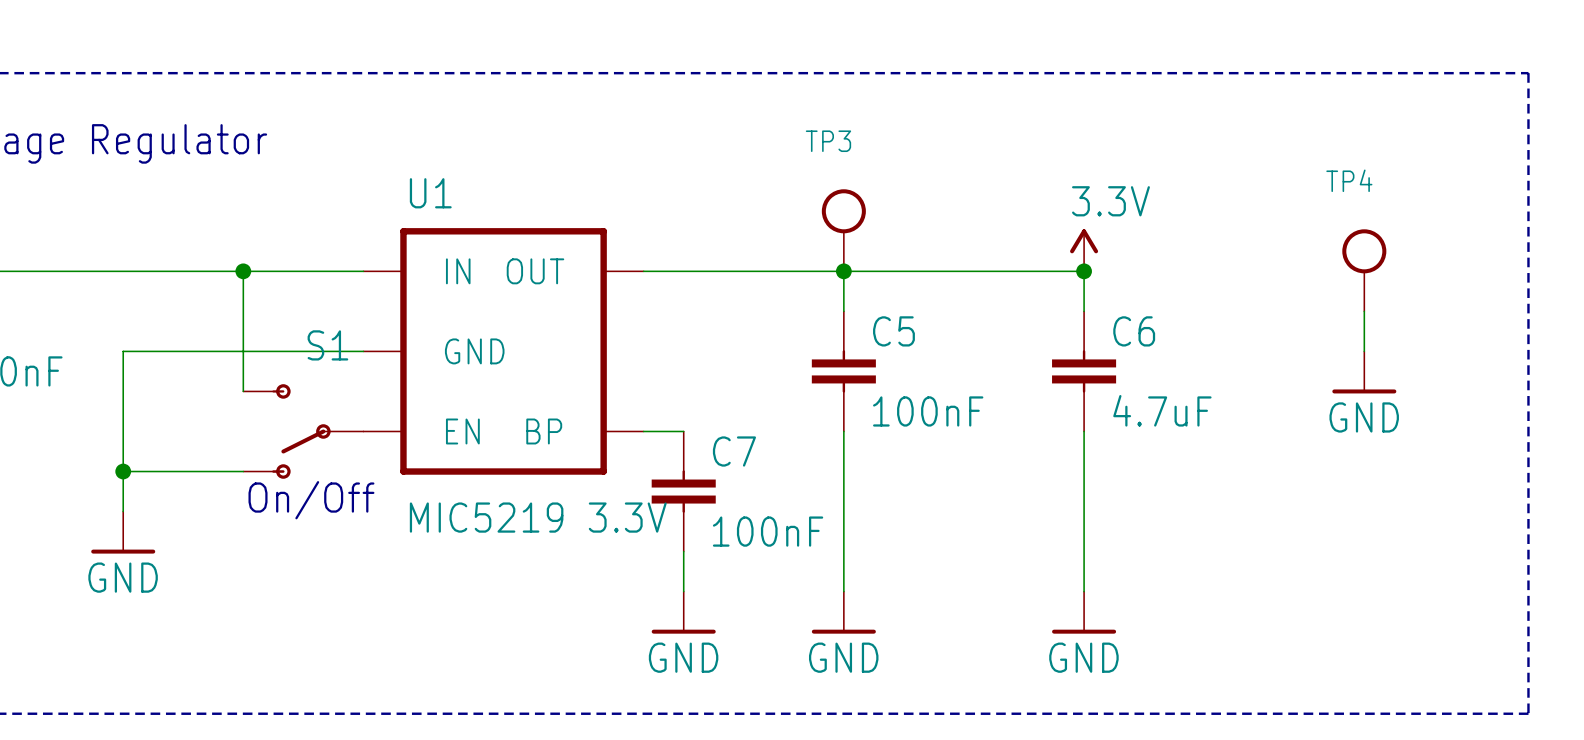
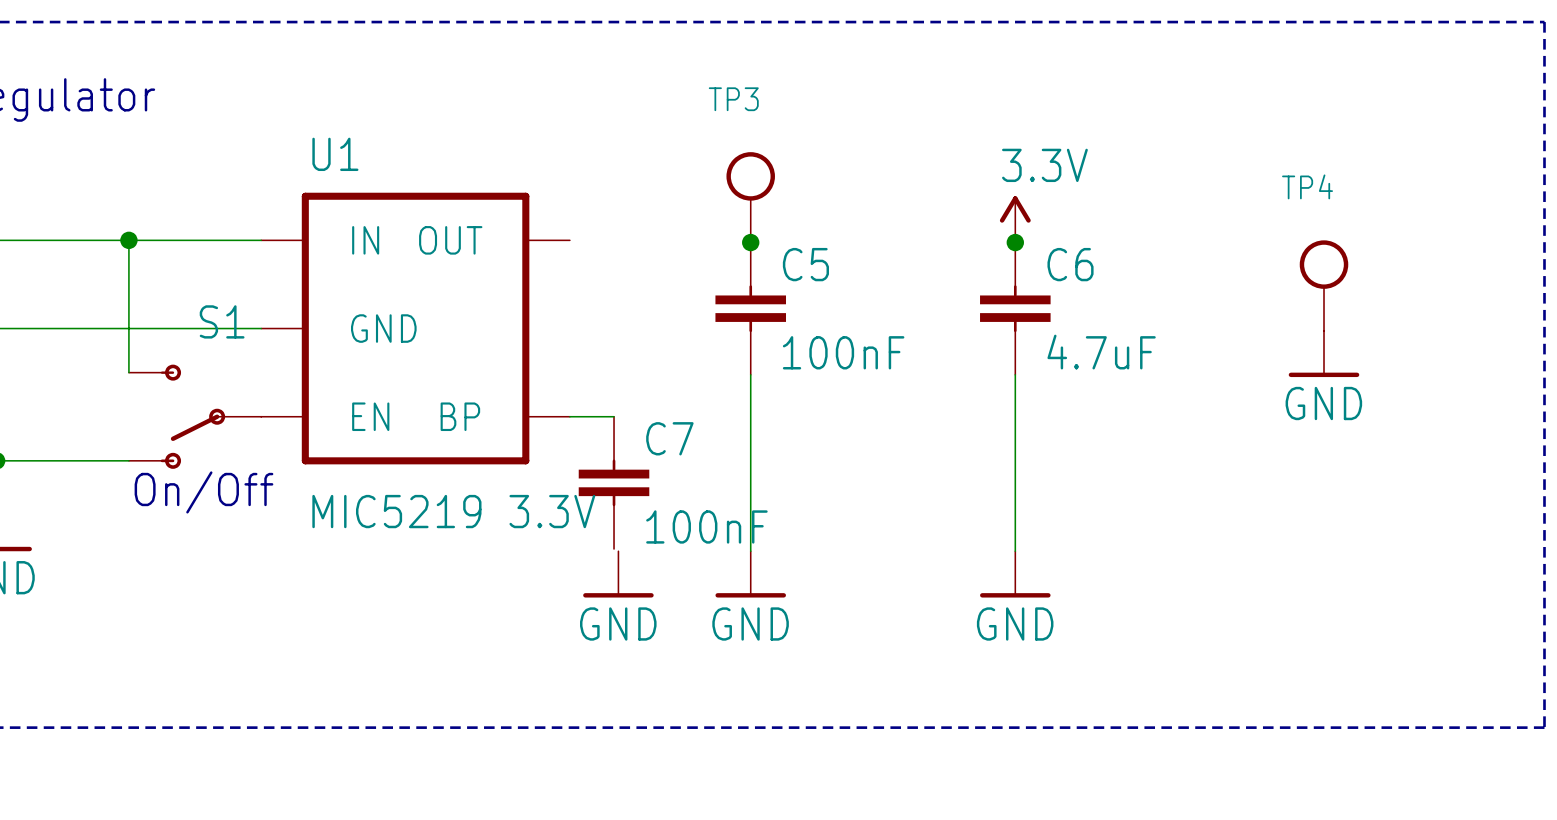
TP3 position: (843, 230) -> (750, 197)
power symbol position: 3.3V (1084, 250) -> 3.3V (1015, 219)
TP4 position: (1364, 270) -> (1324, 285)
wire: (643, 271) (1084, 271) (1084, 311) -> none
wire: (843, 271) (843, 311) -> none
junction position: (843, 271) -> (750, 242)
junction position: (1084, 271) -> (1015, 242)
wire: (1364, 311) (1364, 351) -> none
C5 position: (843, 371) -> (750, 308)
C6 position: (1084, 371) -> (1015, 308)
power symbol position: GND (1364, 372) -> GND (1324, 353)
wire: (843, 431) (843, 591) -> (750, 374) (750, 551)
wire: (1084, 431) (1084, 591) -> (1015, 374) (1015, 551)
wire: (683, 551) (683, 591) -> none
power symbol position: GND (683, 612) -> GND (618, 574)
power symbol position: GND (843, 612) -> GND (750, 574)
power symbol position: GND (1084, 612) -> GND (1015, 574)

